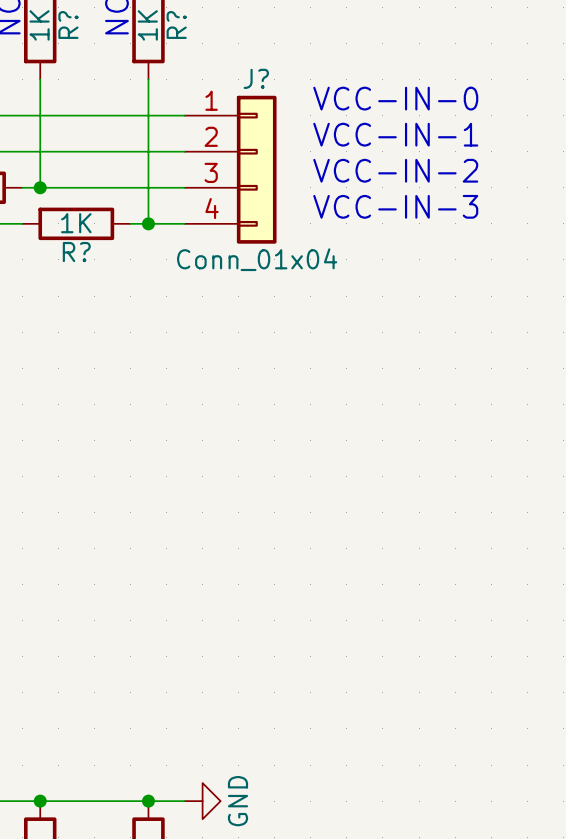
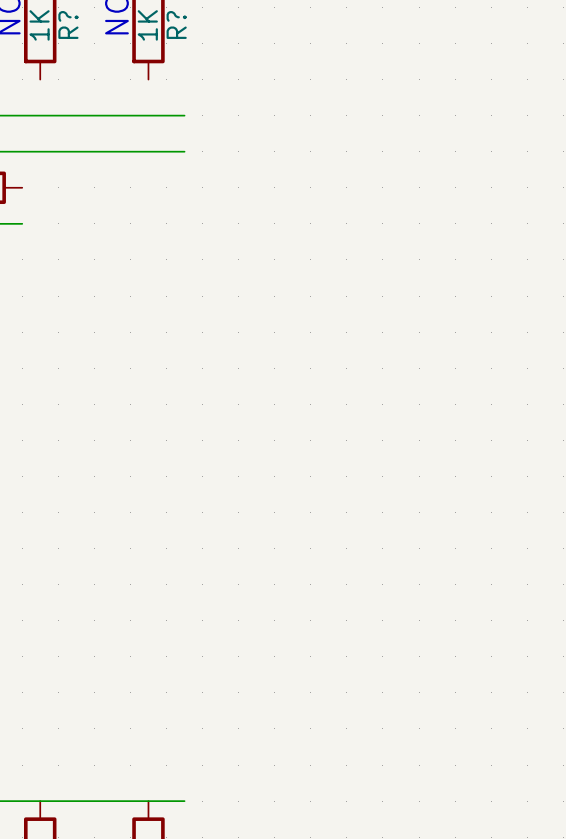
wire: (40, 79) (40, 187) -> none
wire: (148, 79) (148, 223) -> none
text: VCC-IN-0 (395, 98) -> none
text: VCC-IN-1 (395, 134) -> none
J?: Conn_01x04 (230, 169) -> none
text: VCC-IN-2 (395, 170) -> none
wire: (22, 187) (184, 187) -> none
junction: (40, 187) -> none
text: VCC-IN-3 (395, 206) -> none
R?: 1K (76, 223) -> none
wire: (130, 223) (184, 223) -> none
junction: (148, 223) -> none
junction: (40, 801) -> none
junction: (148, 801) -> none
power symbol: GND (202, 801) -> none

